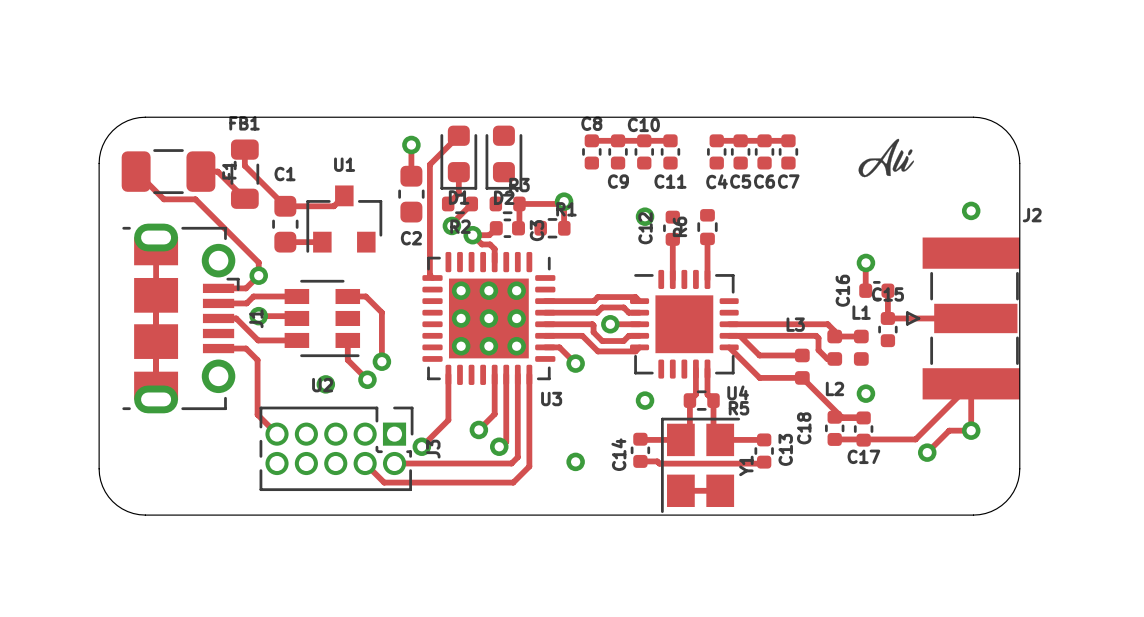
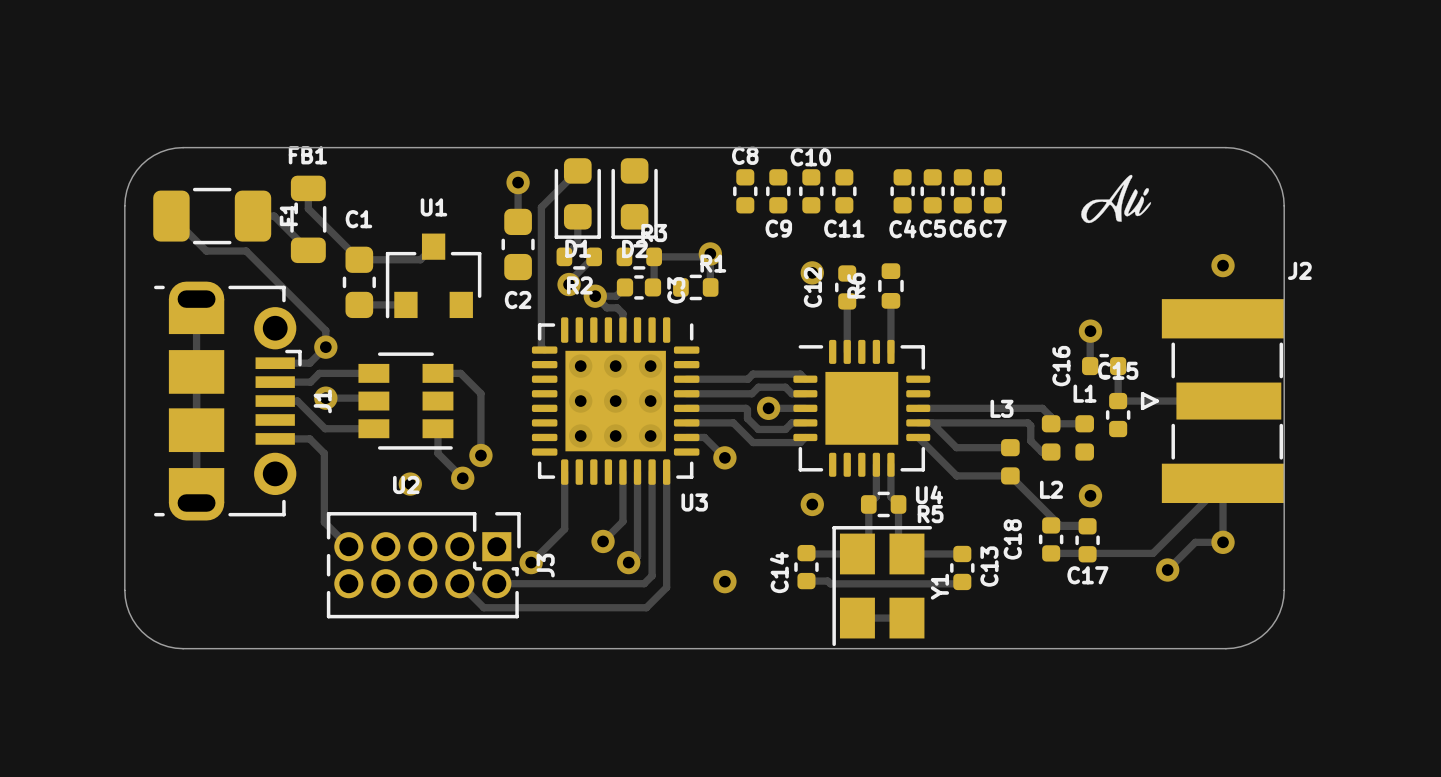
track: (591, 140) (670, 140) -> none
track: (716, 140) (788, 140) -> none

